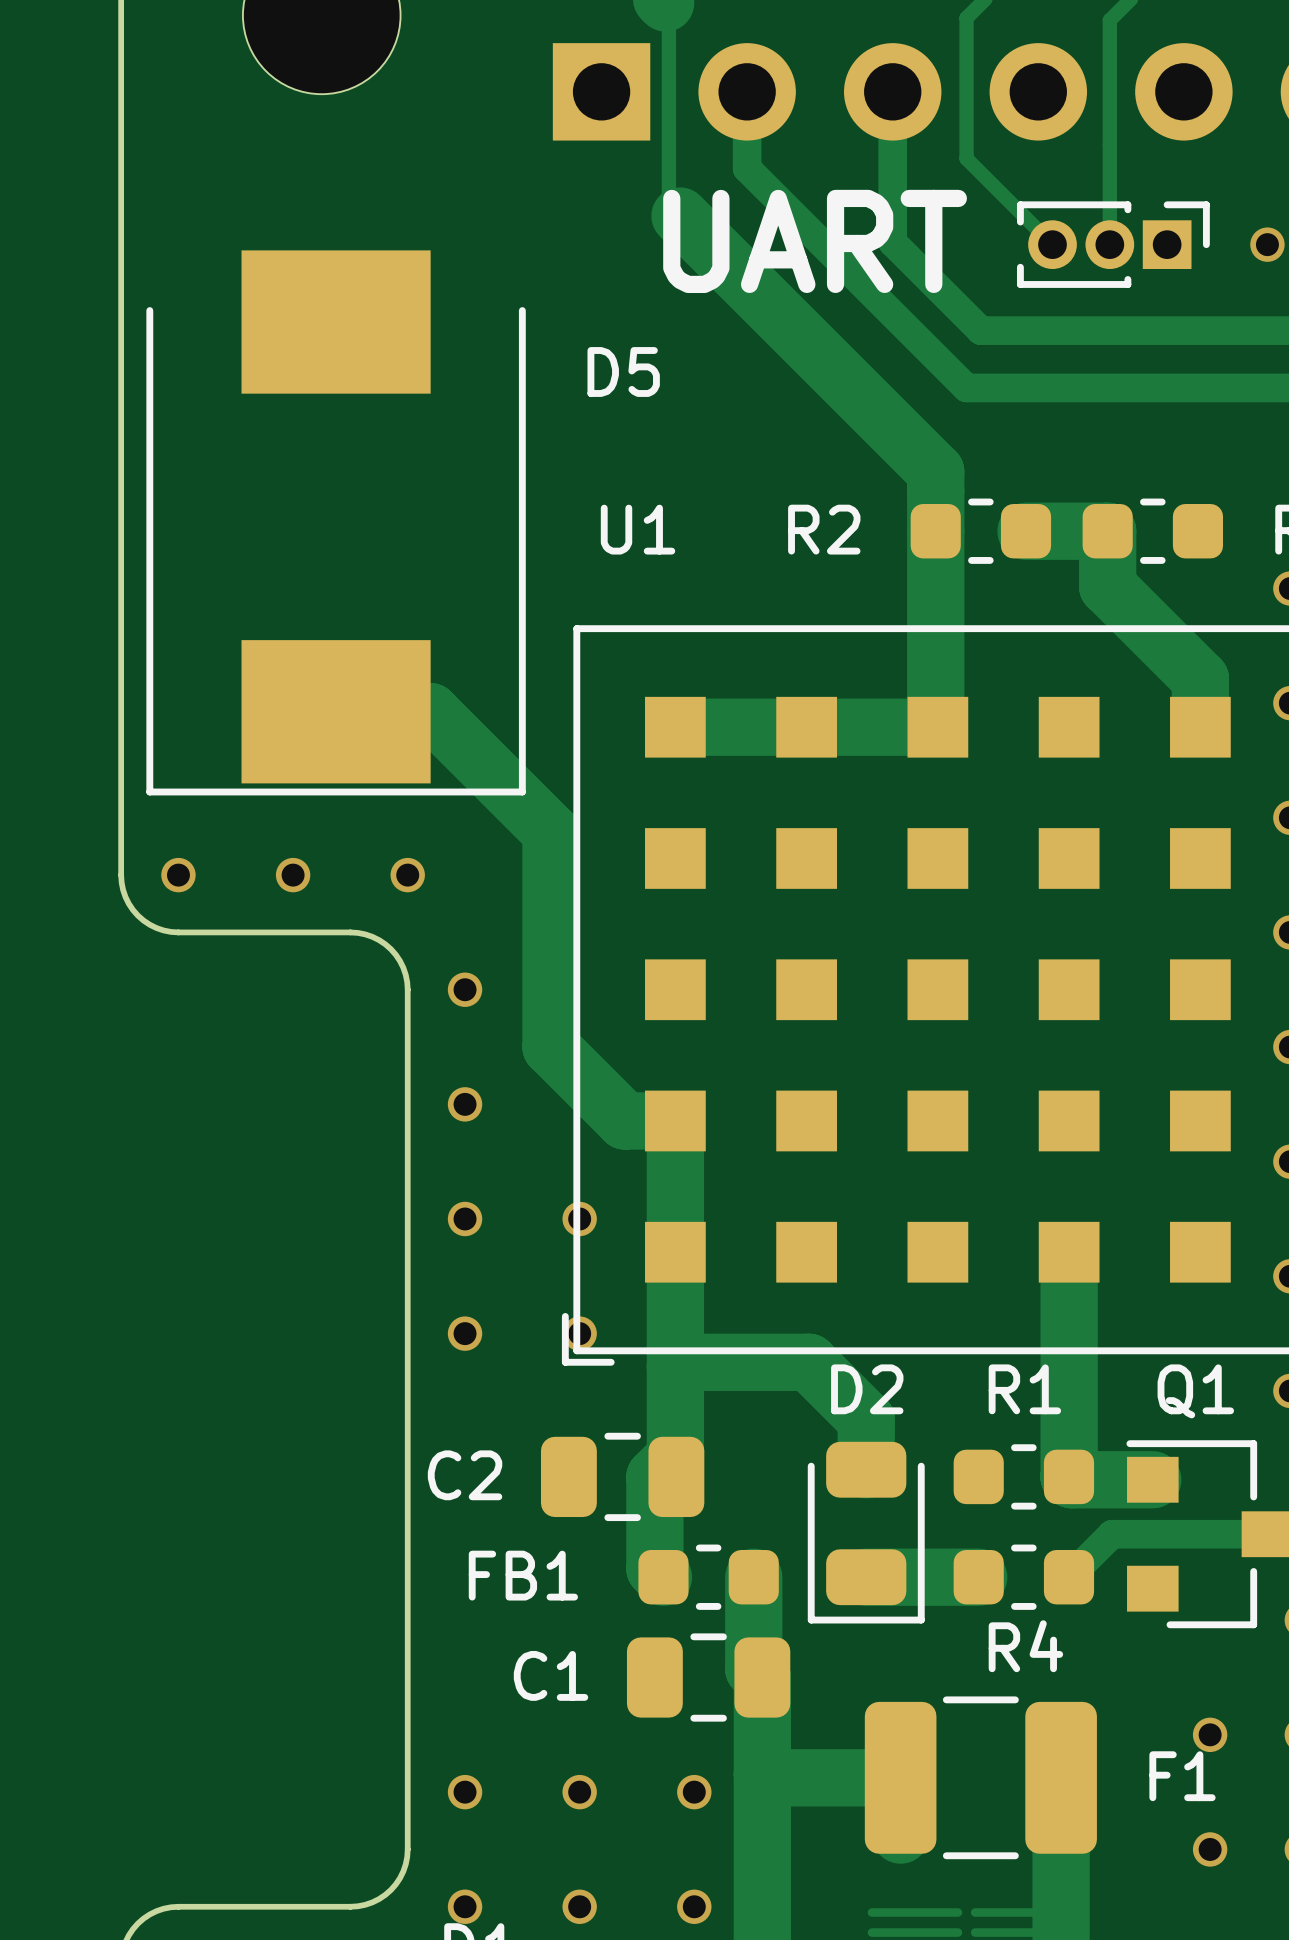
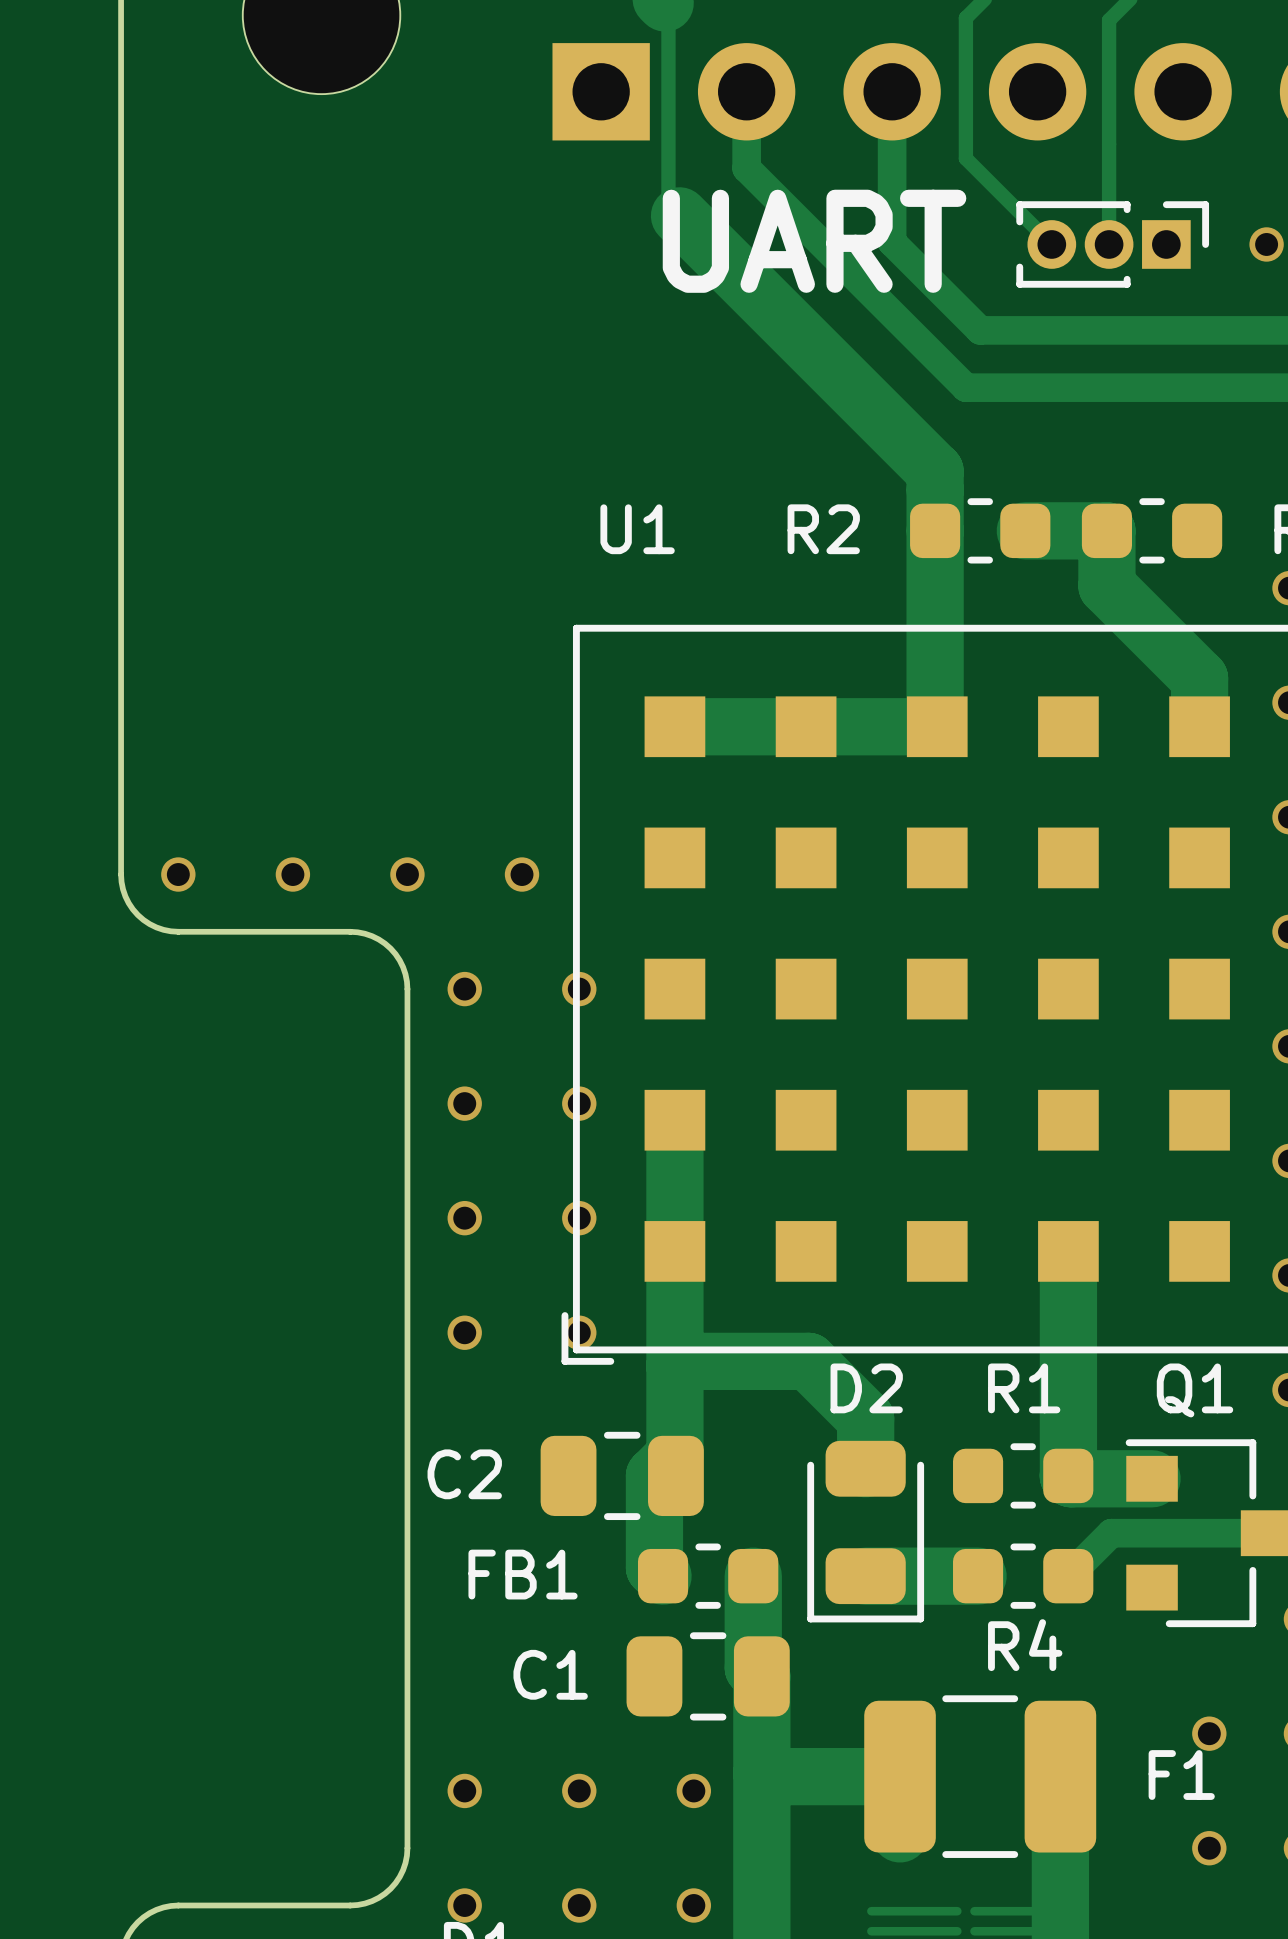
D5: (336, 522) -> none
track: (336, 711) (430, 711) (551, 832) (551, 1047) (624, 1120) (675, 1120) -> none
via: none -> (522, 874)
via: none -> (579, 989)
via: none -> (579, 1103)

